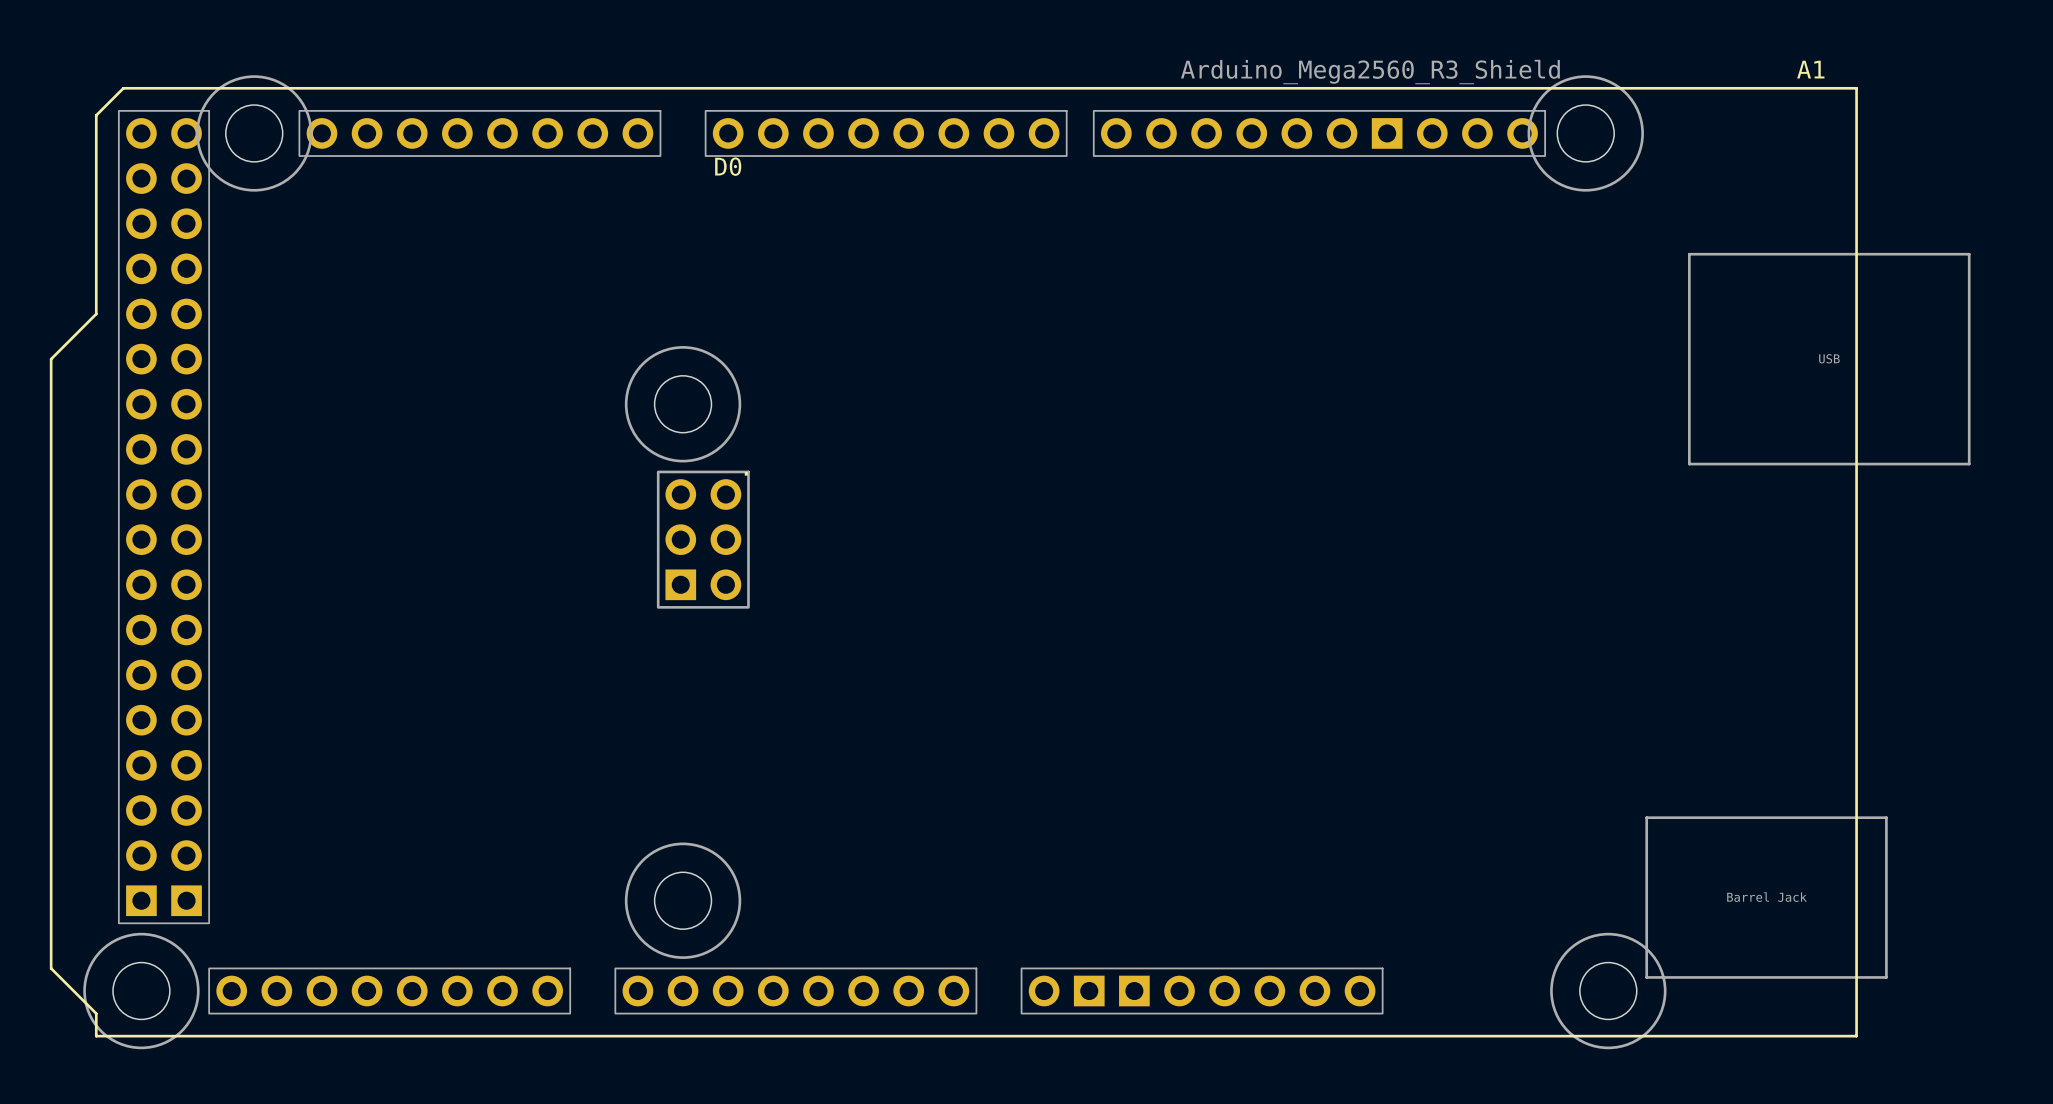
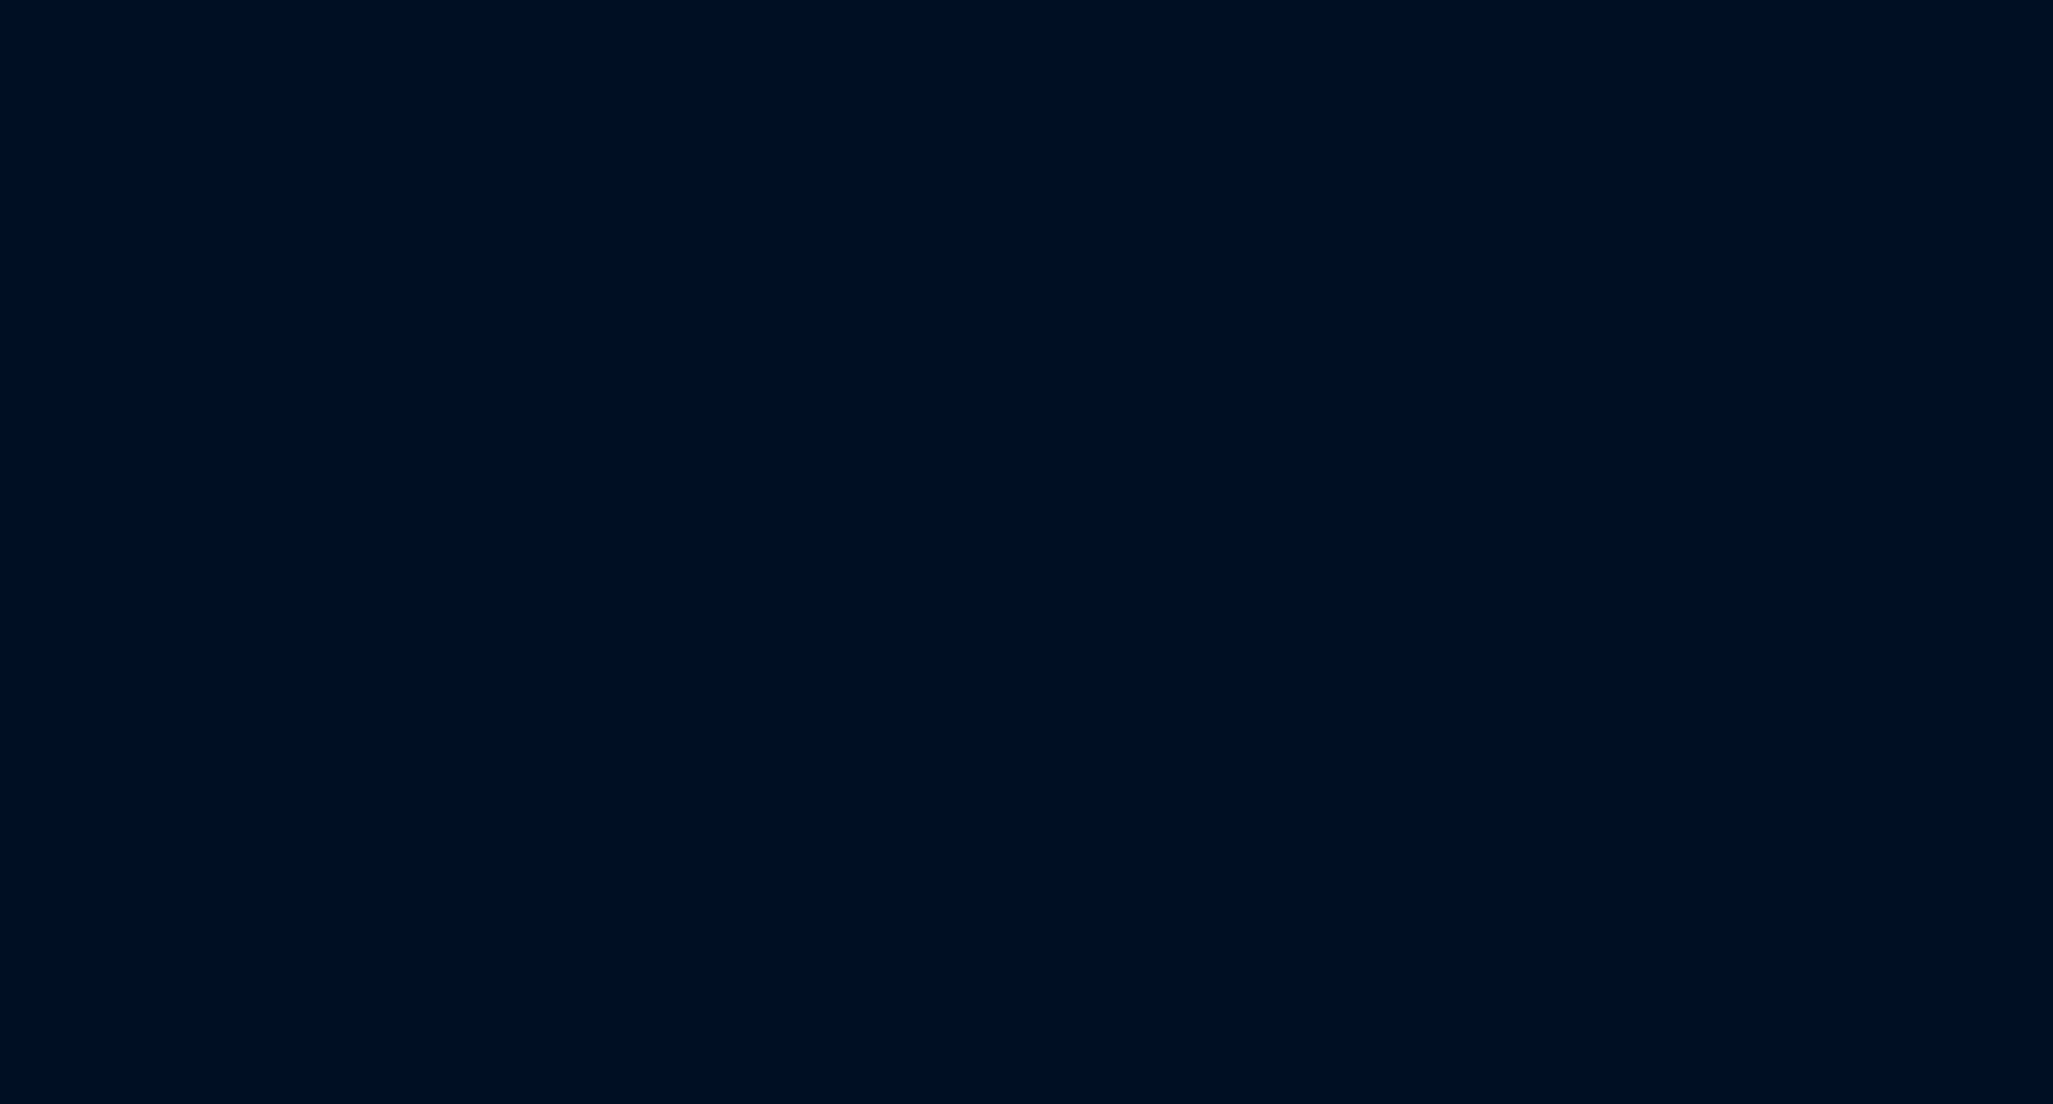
A1: Arduino_Mega2560_R3_Shield (1010, 562) -> none

